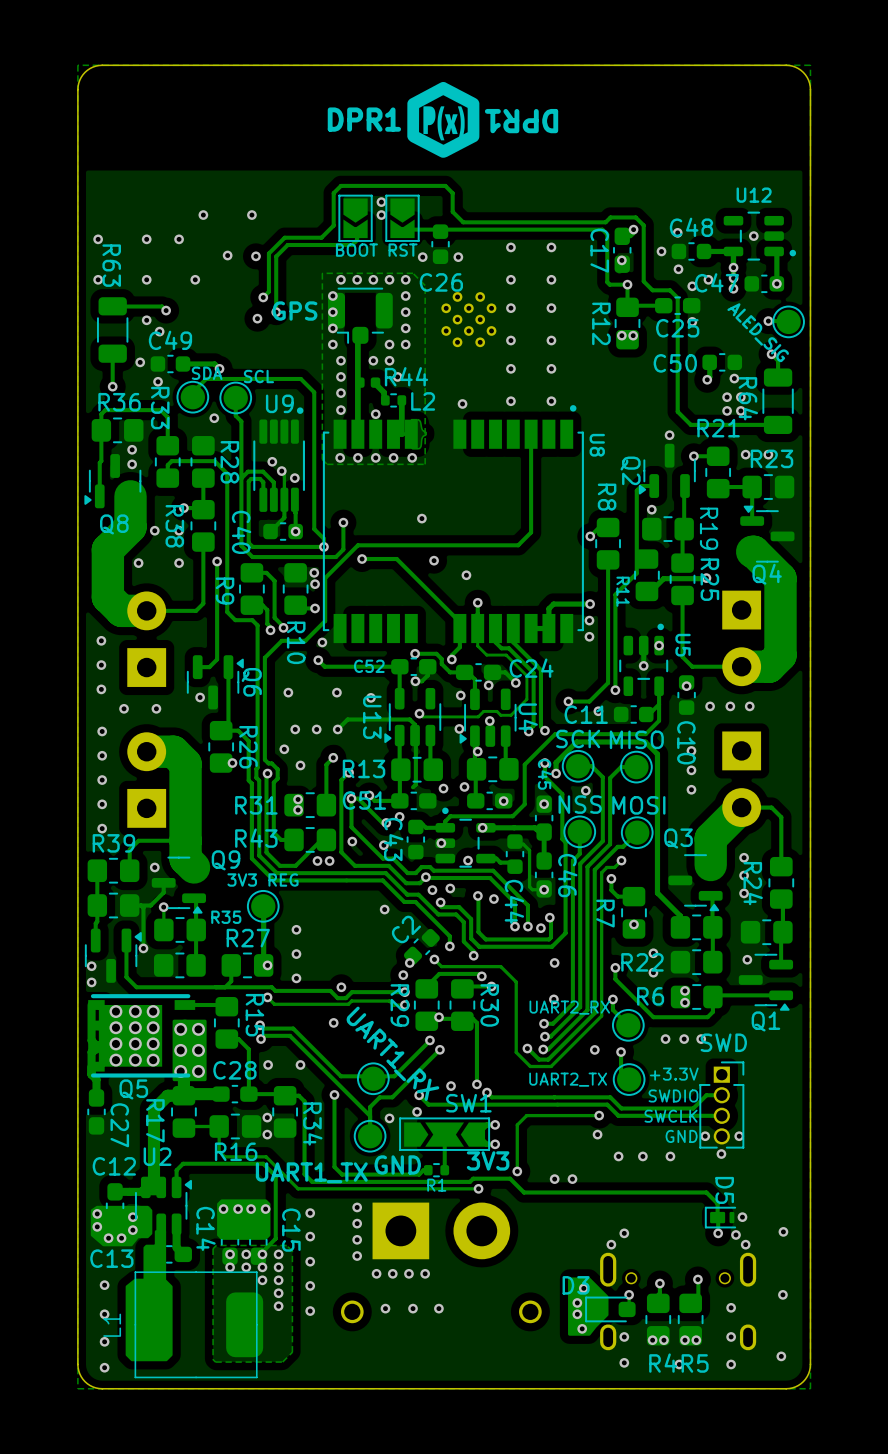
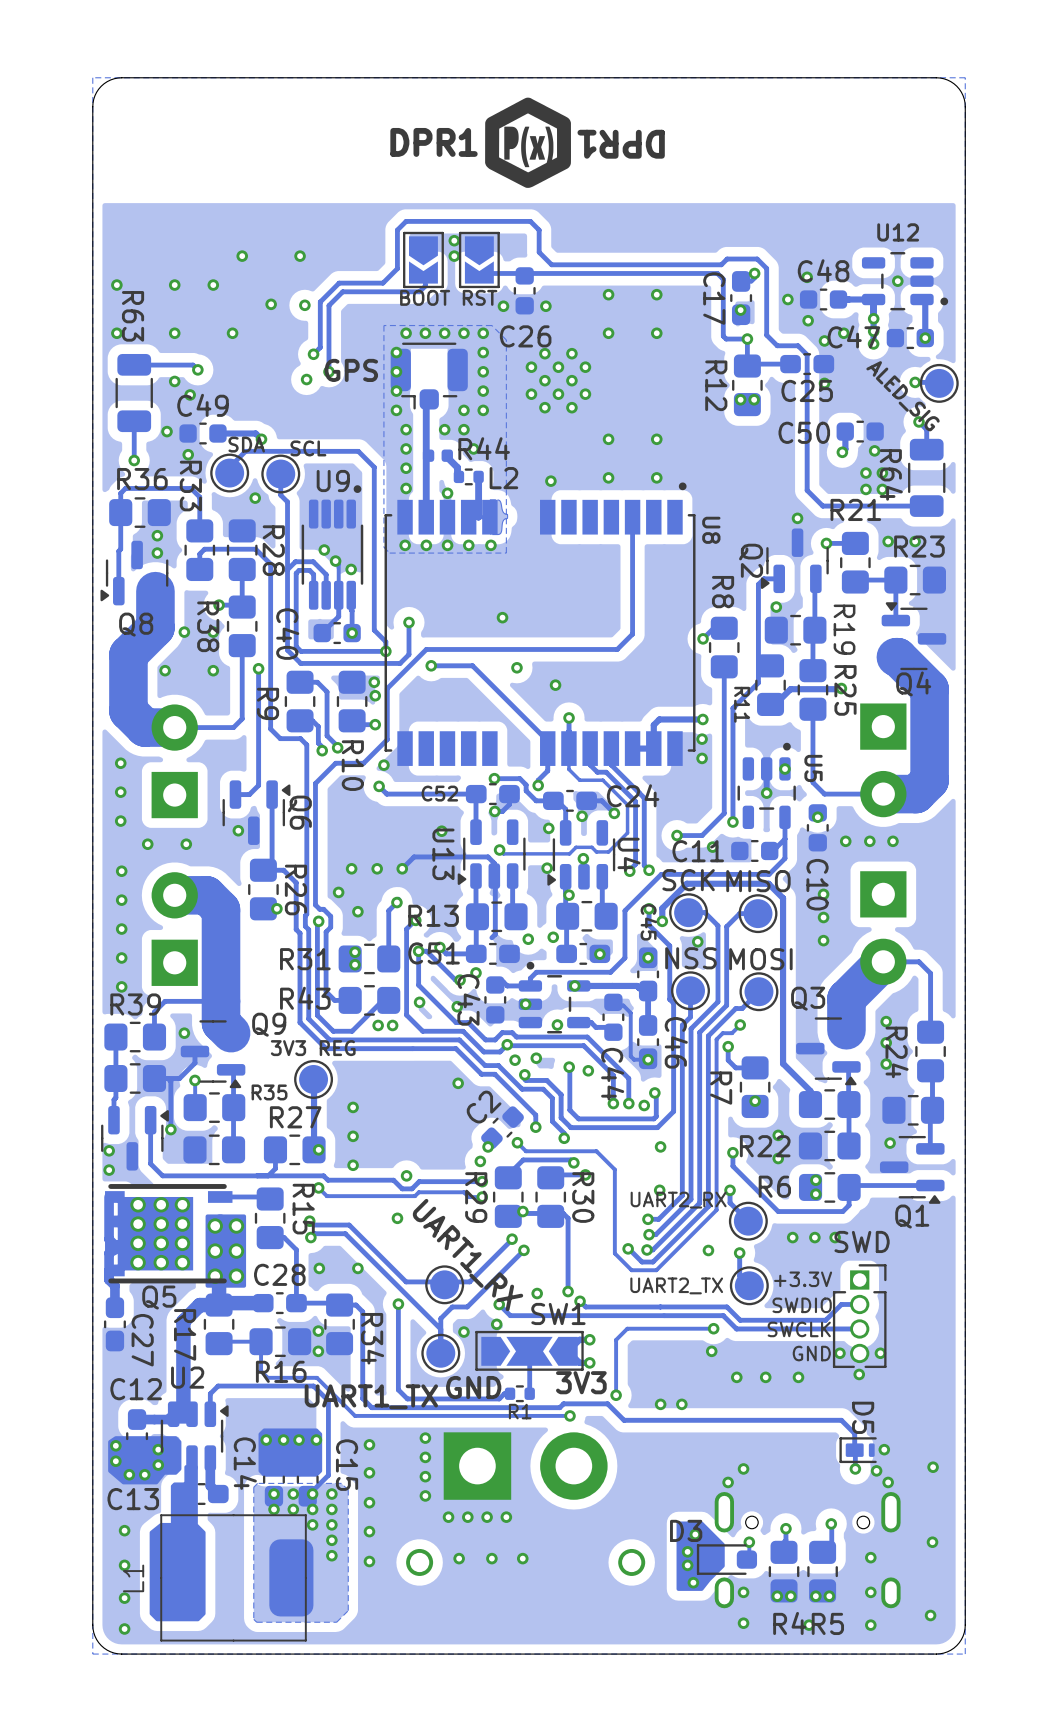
via: (510, 308) -> none
via: (551, 308) -> none
via: (510, 340) -> none
via: (551, 340) -> none
via: (288, 692) -> none
via: (336, 692) -> none

